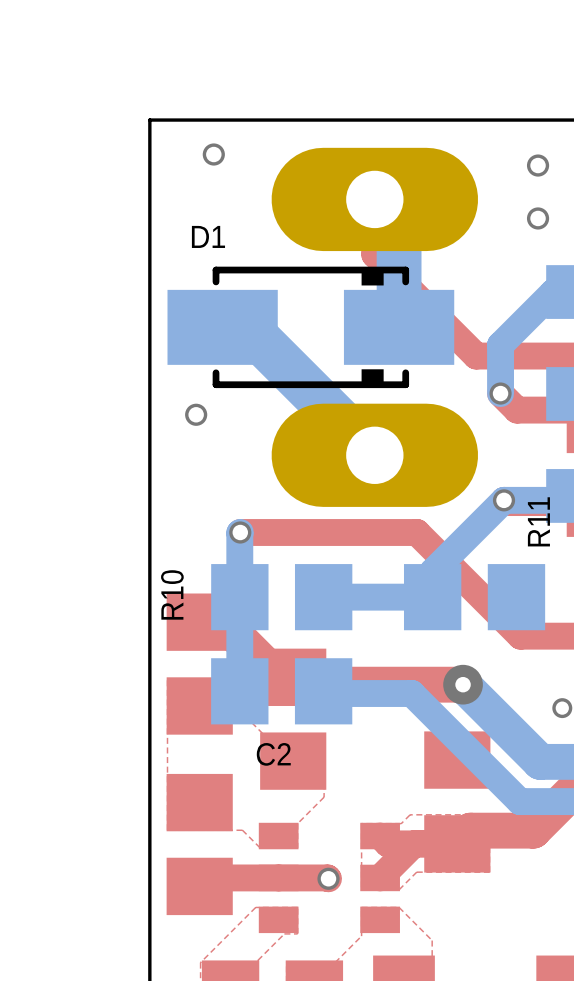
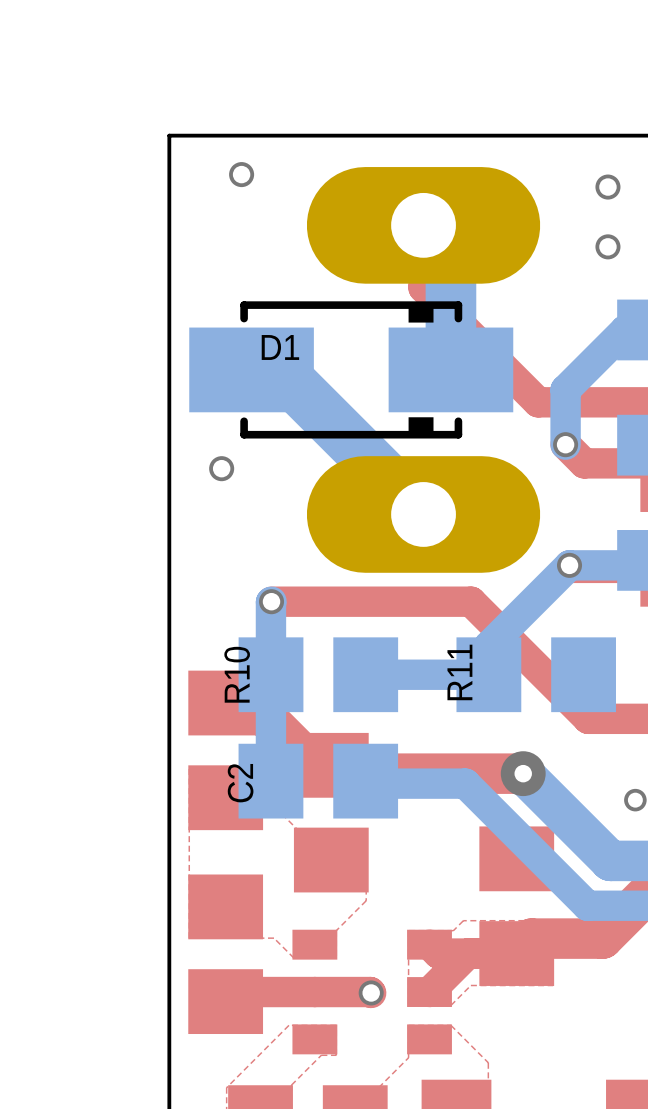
D1 name position: D1 (208, 236) -> D1 (280, 347)
R11 name position: R11 (538, 521) -> R11 (459, 672)
R10 name position: R10 (172, 594) -> R10 (237, 674)
C2 name rotation: 0° (273, 754) -> 90° counterclockwise (240, 783)
C2 name position: C2 (273, 754) -> C2 (240, 783)

